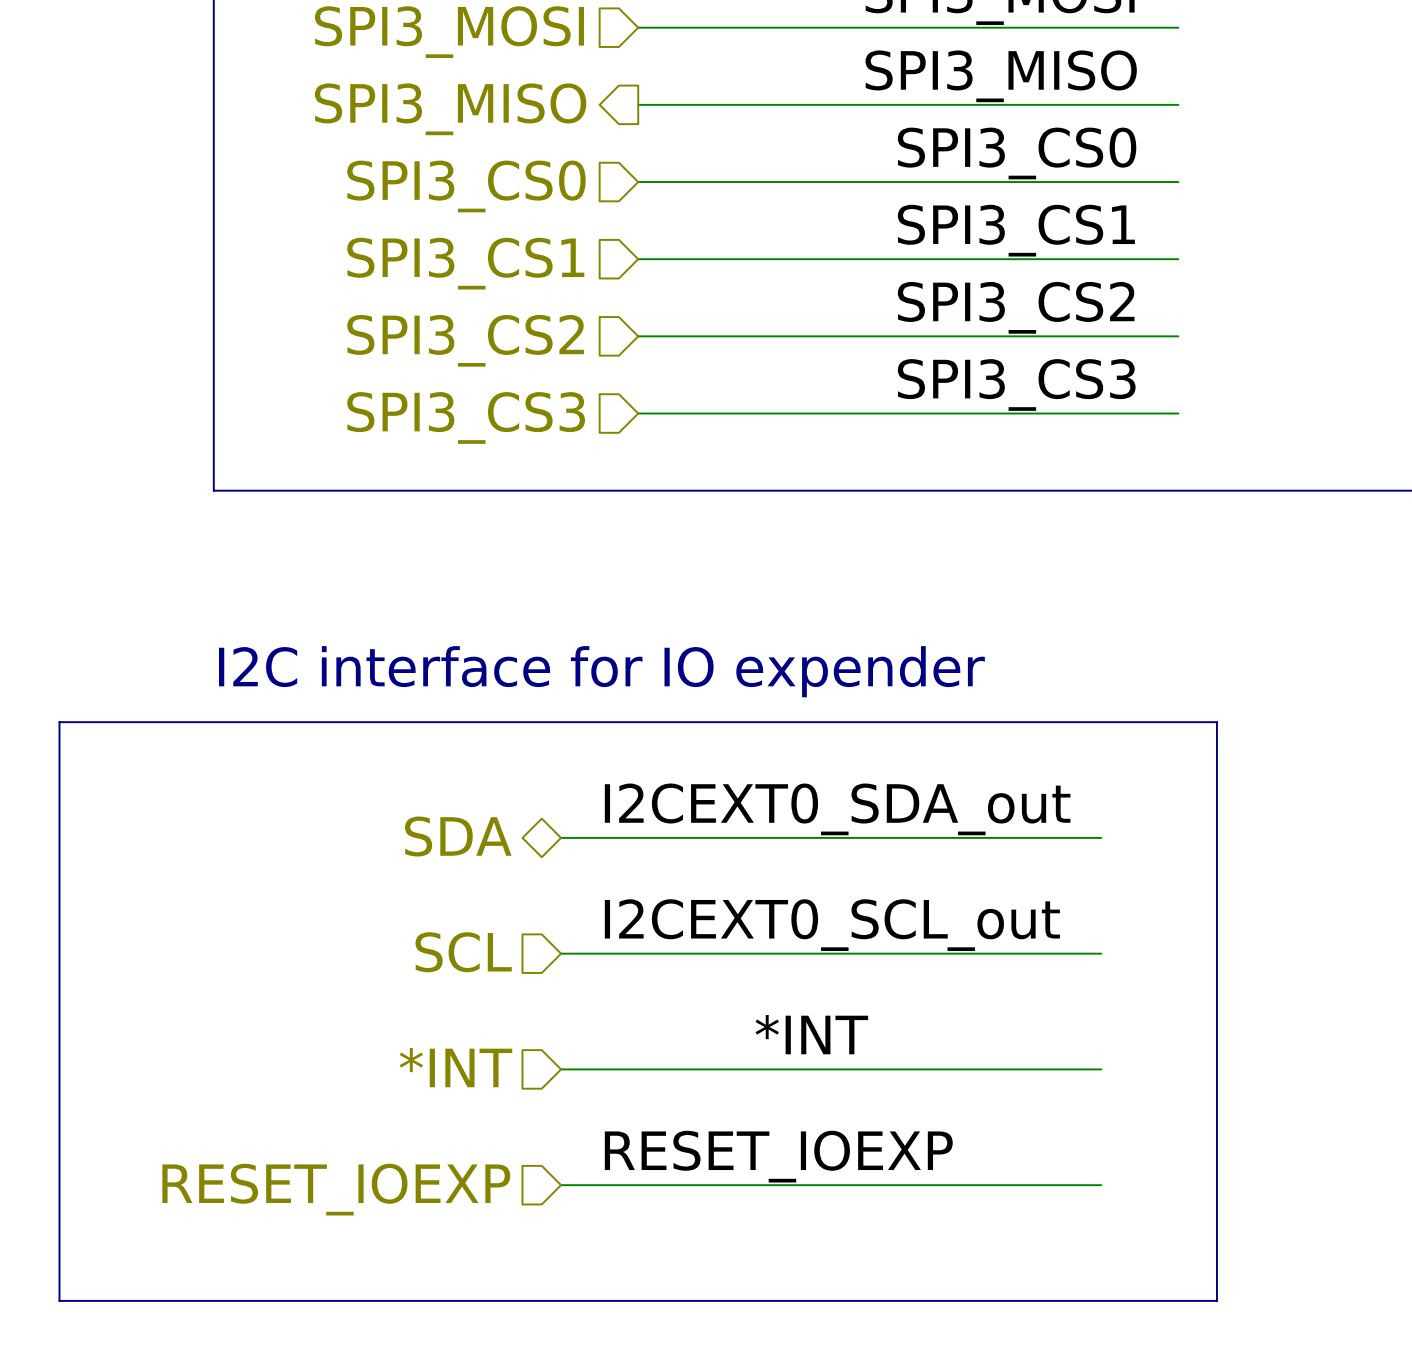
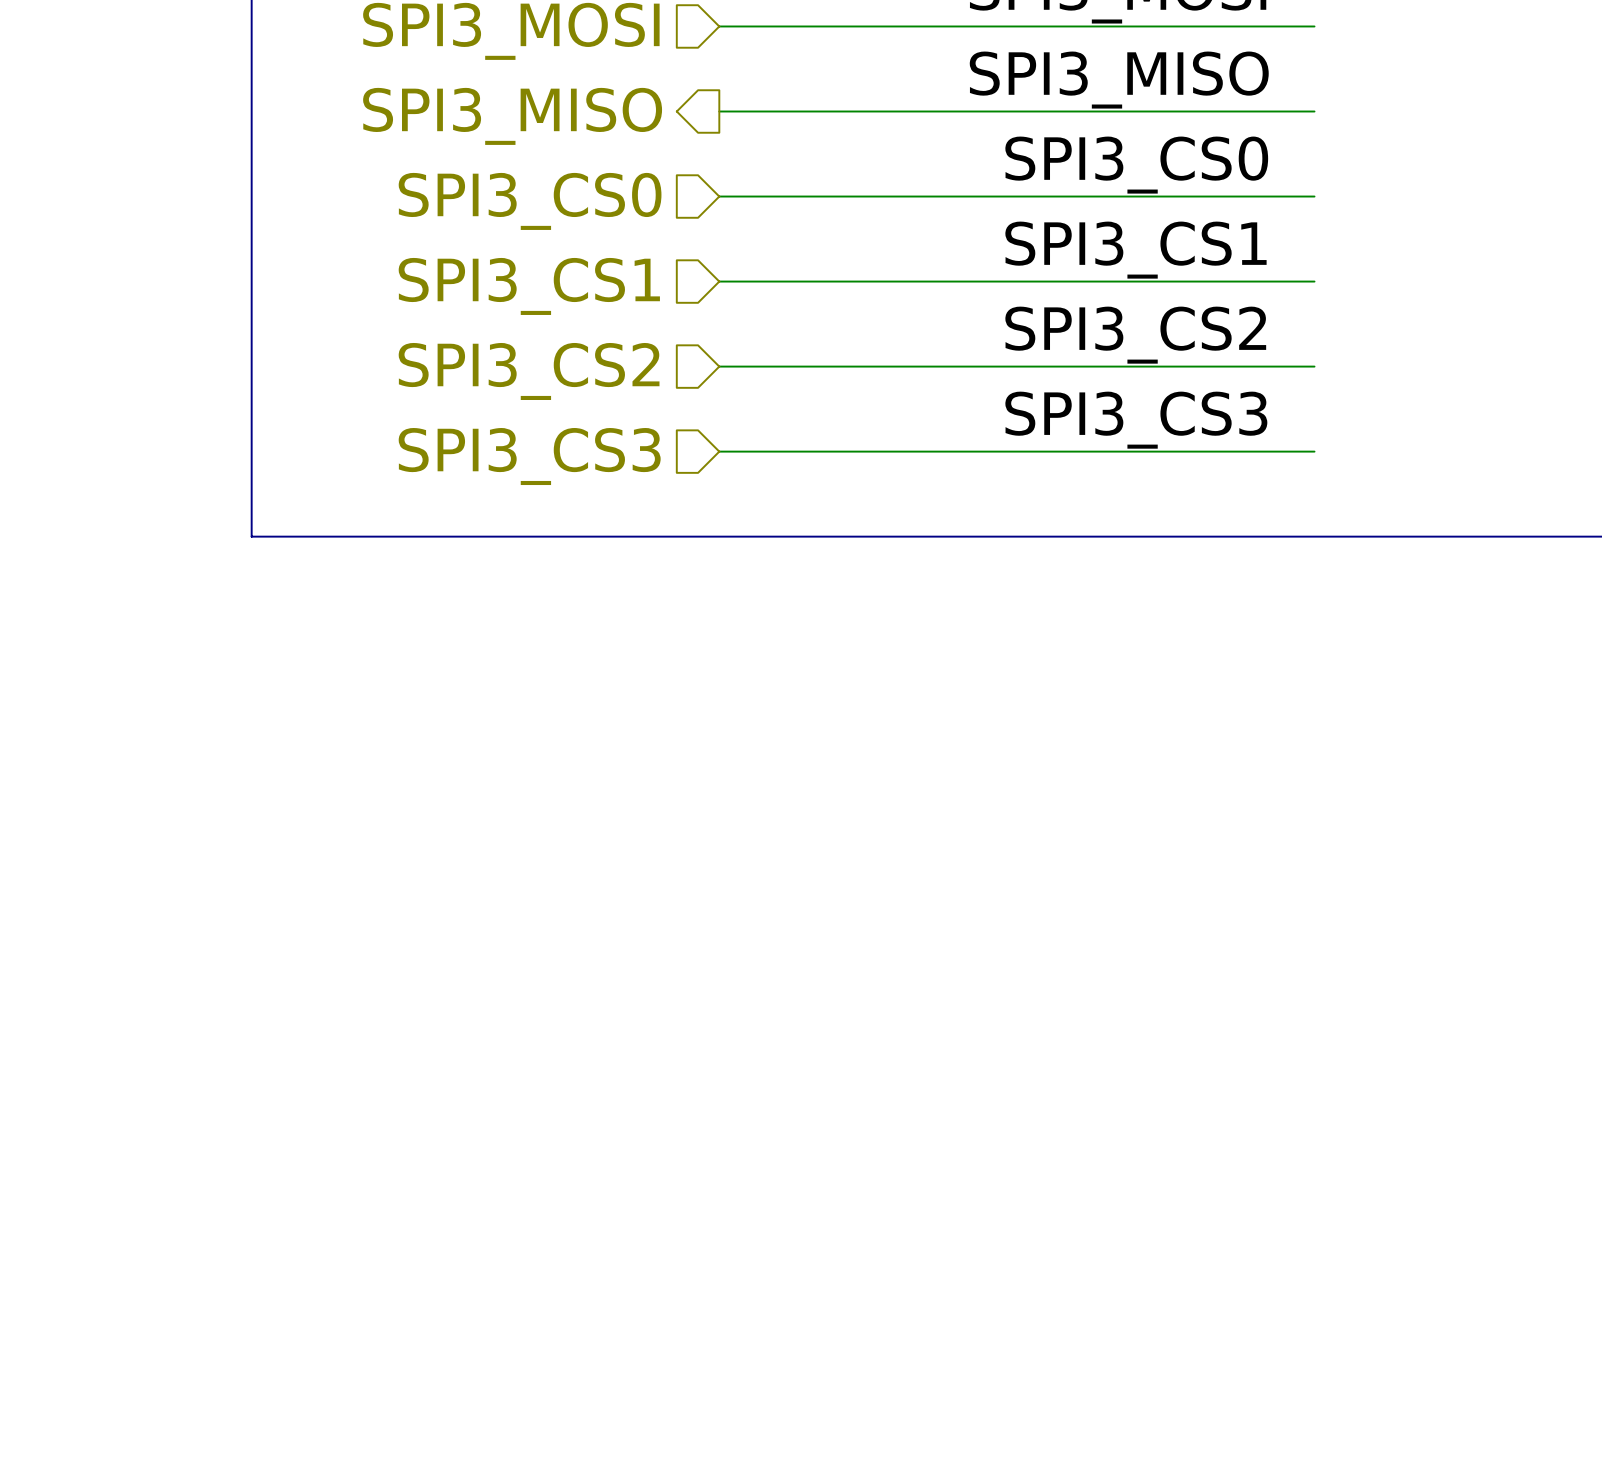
text: I2C interface for IO expender (601, 671) -> none
line: (59, 722) (59, 1300) (1216, 1300) (1216, 722) (59, 722) -> none
label: I2CEXT0_SDA_out (837, 809) -> none
hierarchical label: SDA (458, 836) -> none
wire: (561, 837) (1101, 837) -> none
label: I2CEXT0_SCL_out (832, 925) -> none
hierarchical label: SCL (463, 952) -> none
wire: (561, 953) (1101, 953) -> none
label: *INT (811, 1034) -> none
hierarchical label: *INT (455, 1067) -> none
wire: (561, 1069) (1101, 1069) -> none
label: RESET_IOEXP (778, 1156) -> none
wire: (561, 1185) (1101, 1185) -> none
hierarchical label: RESET_IOEXP (336, 1189) -> none

